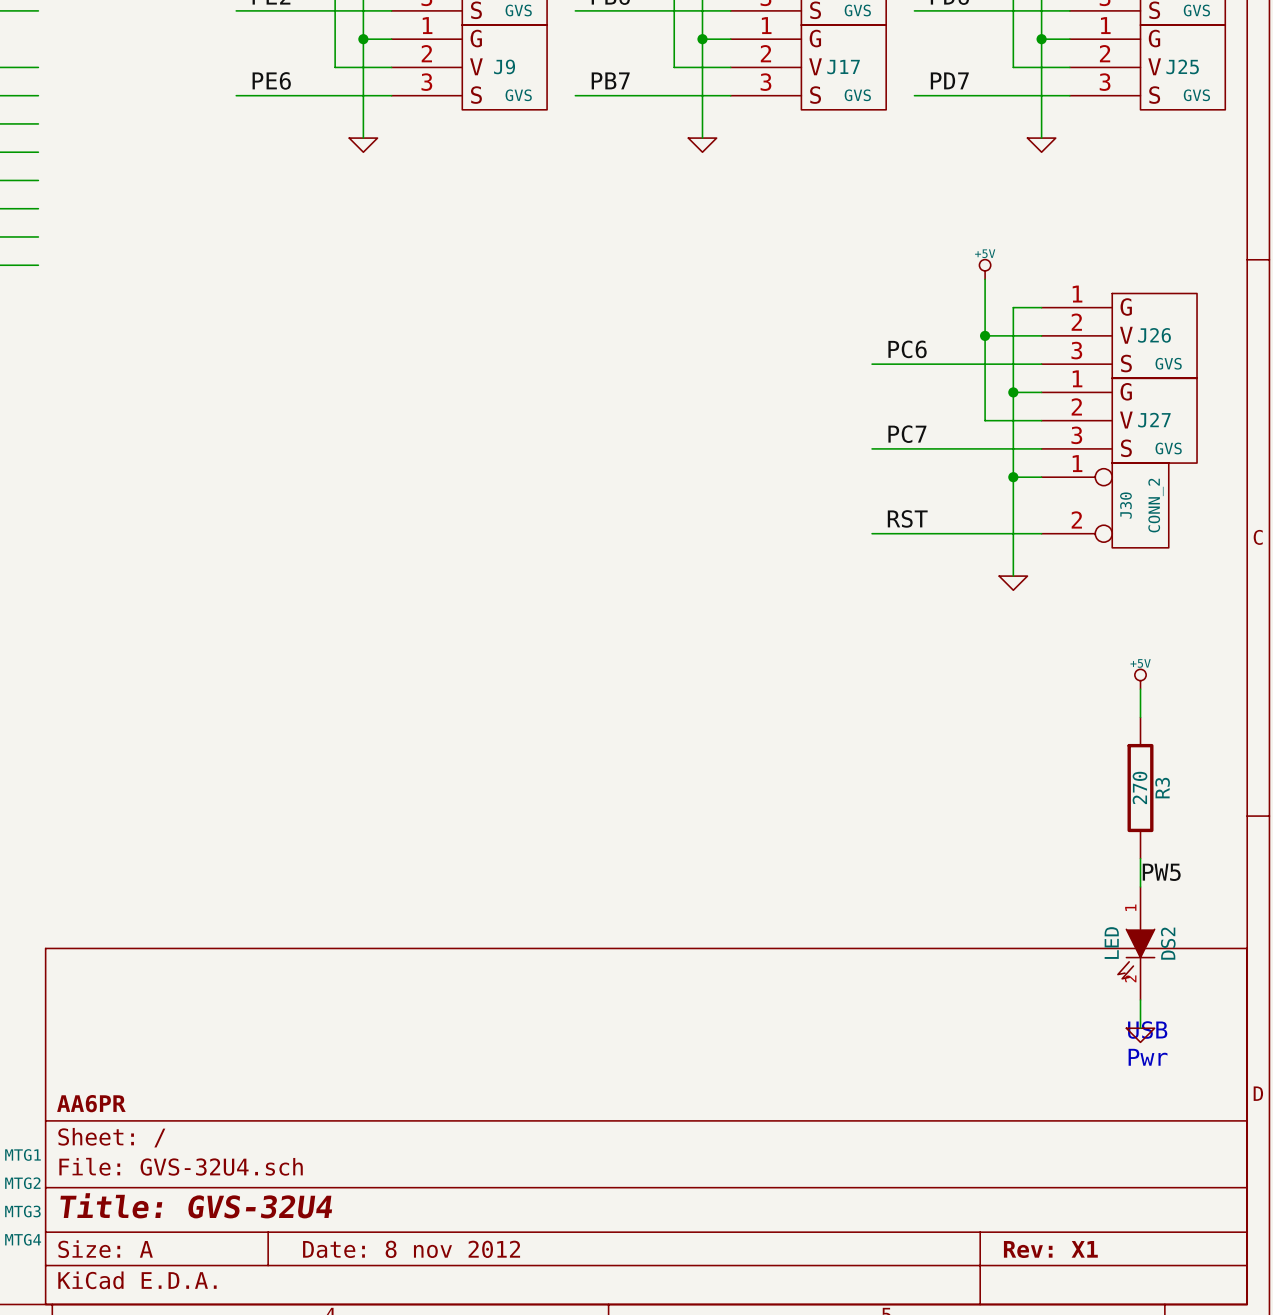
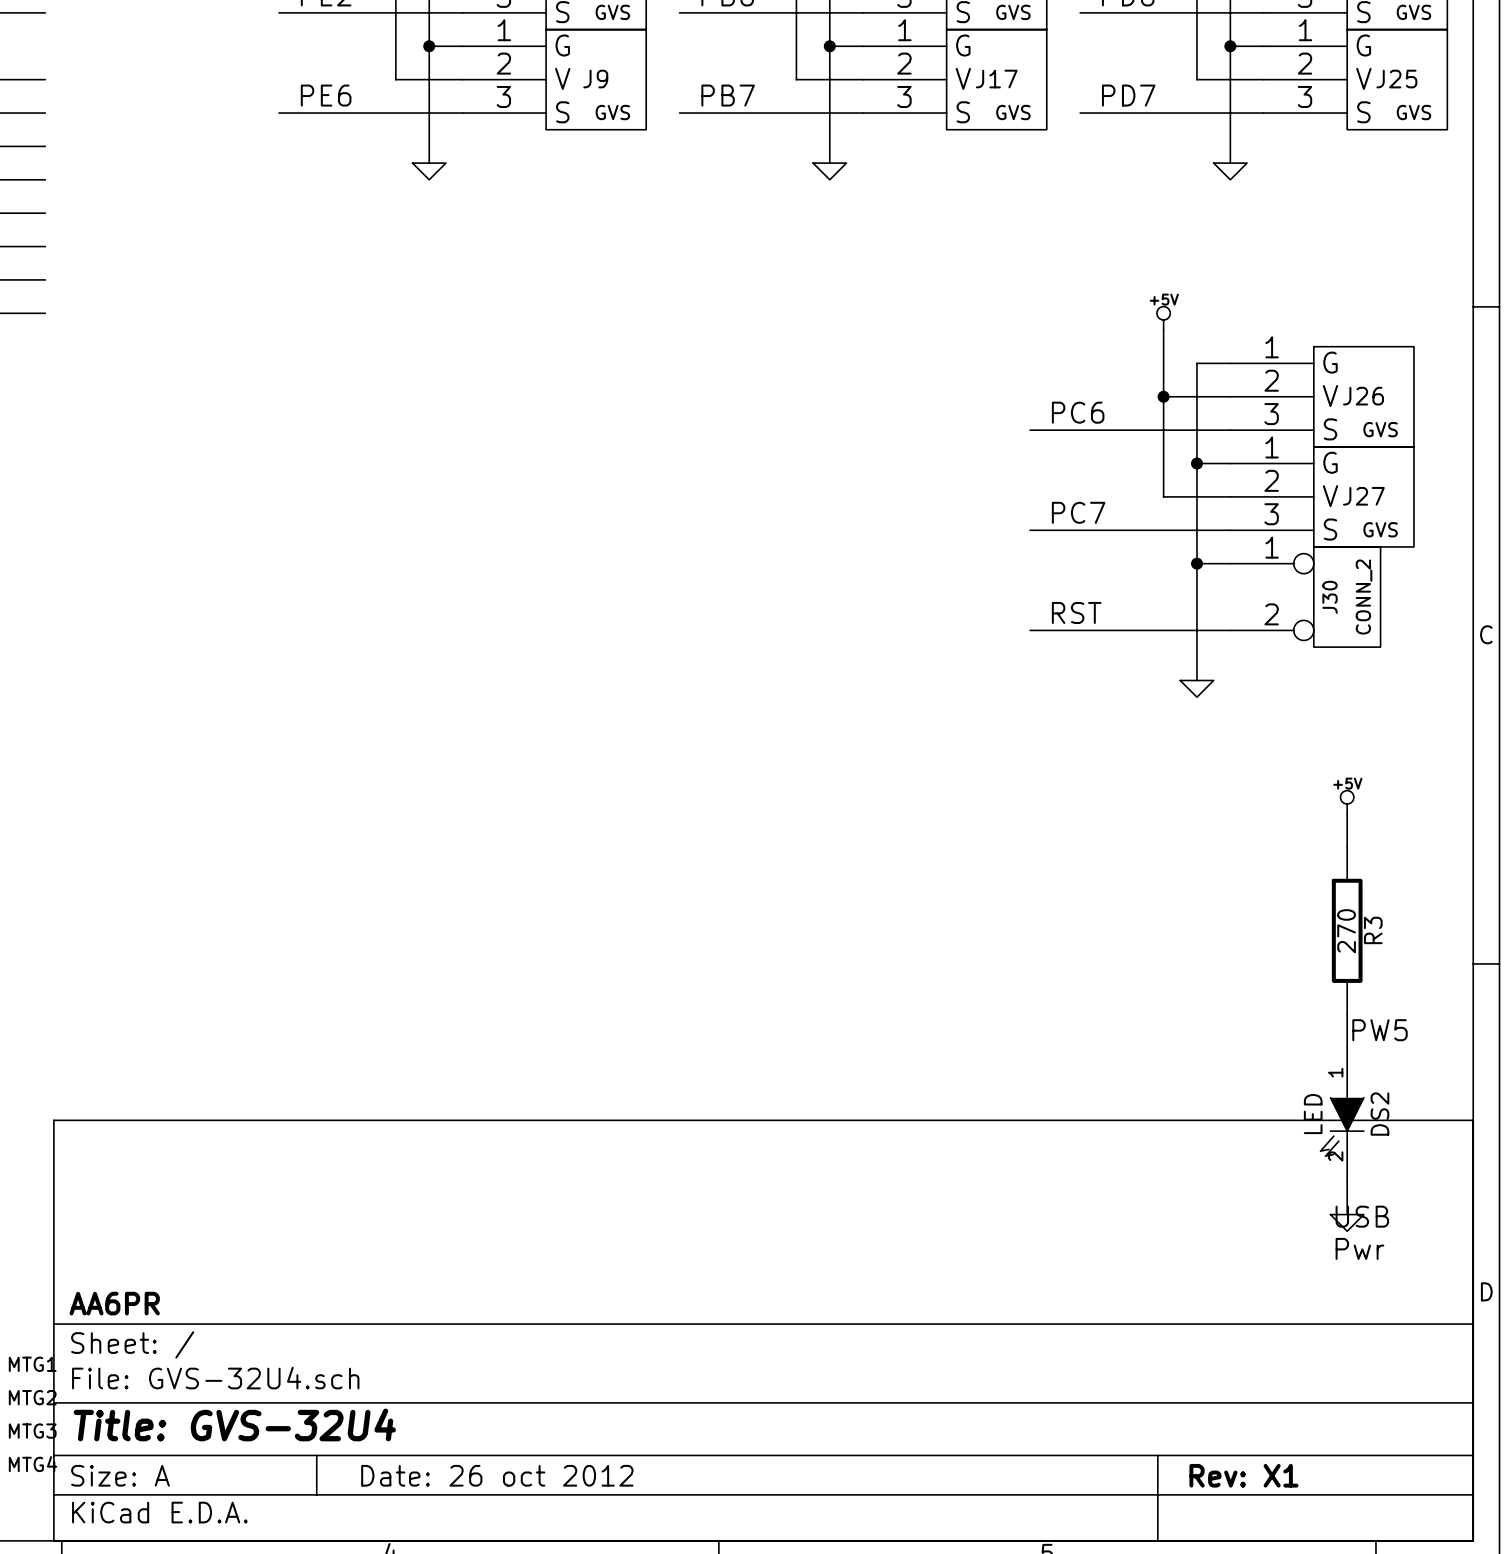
title block: Date: 8 nov 2012 (411, 1249) -> Date: 26 oct 2012 (497, 1475)

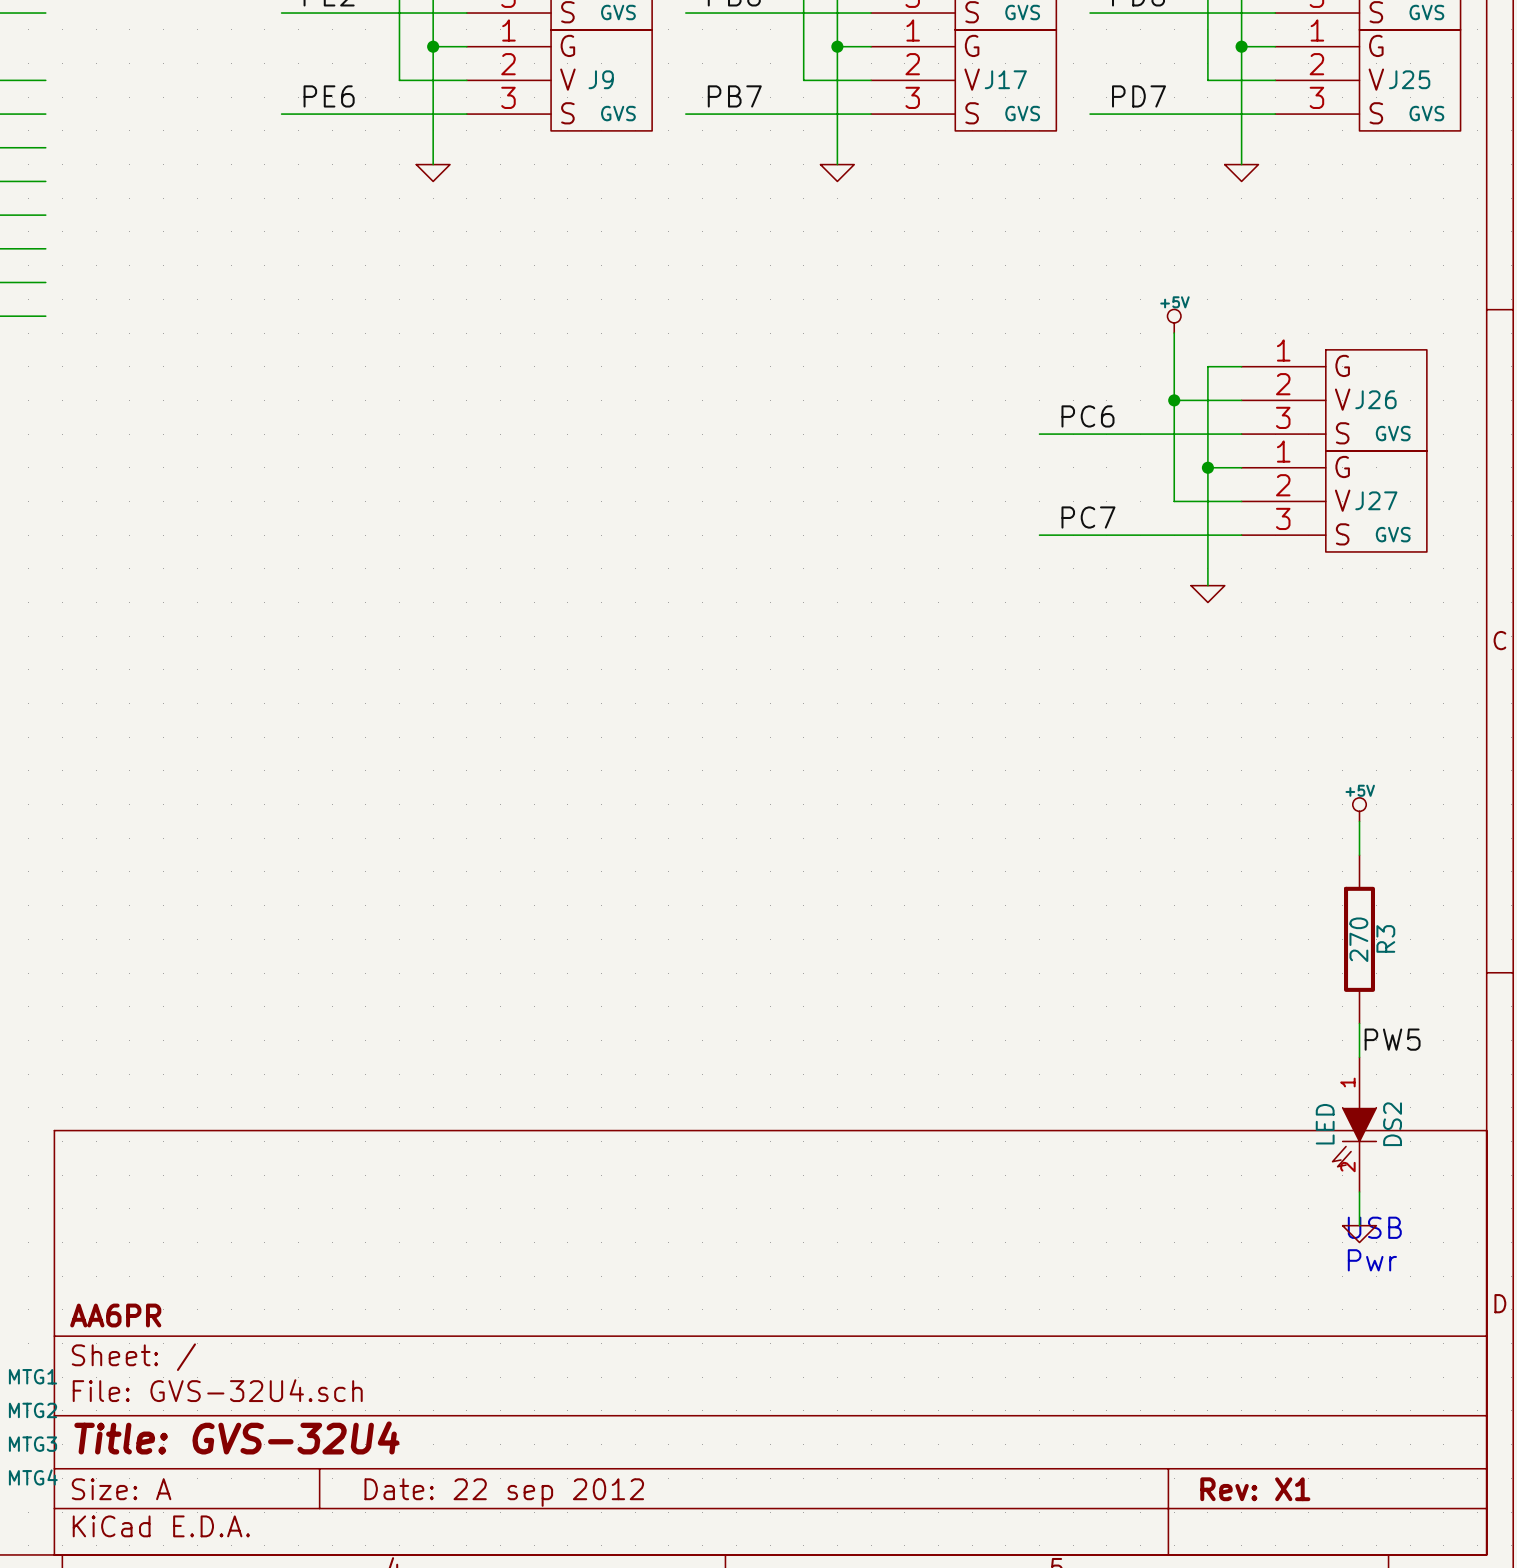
wire: (1196, 563) (1230, 563) -> none
junction: (1196, 563) -> none
wire: (1196, 580) (1196, 680) -> none
J30: CONN_2 (1305, 597) -> none
label: RST (1076, 612) -> none
wire: (1030, 630) (1230, 630) -> none
power symbol position: (1196, 688) -> (1207, 594)
title block: Date: 26 oct 2012 (497, 1475) -> Date: 22 sep 2012 (504, 1492)

